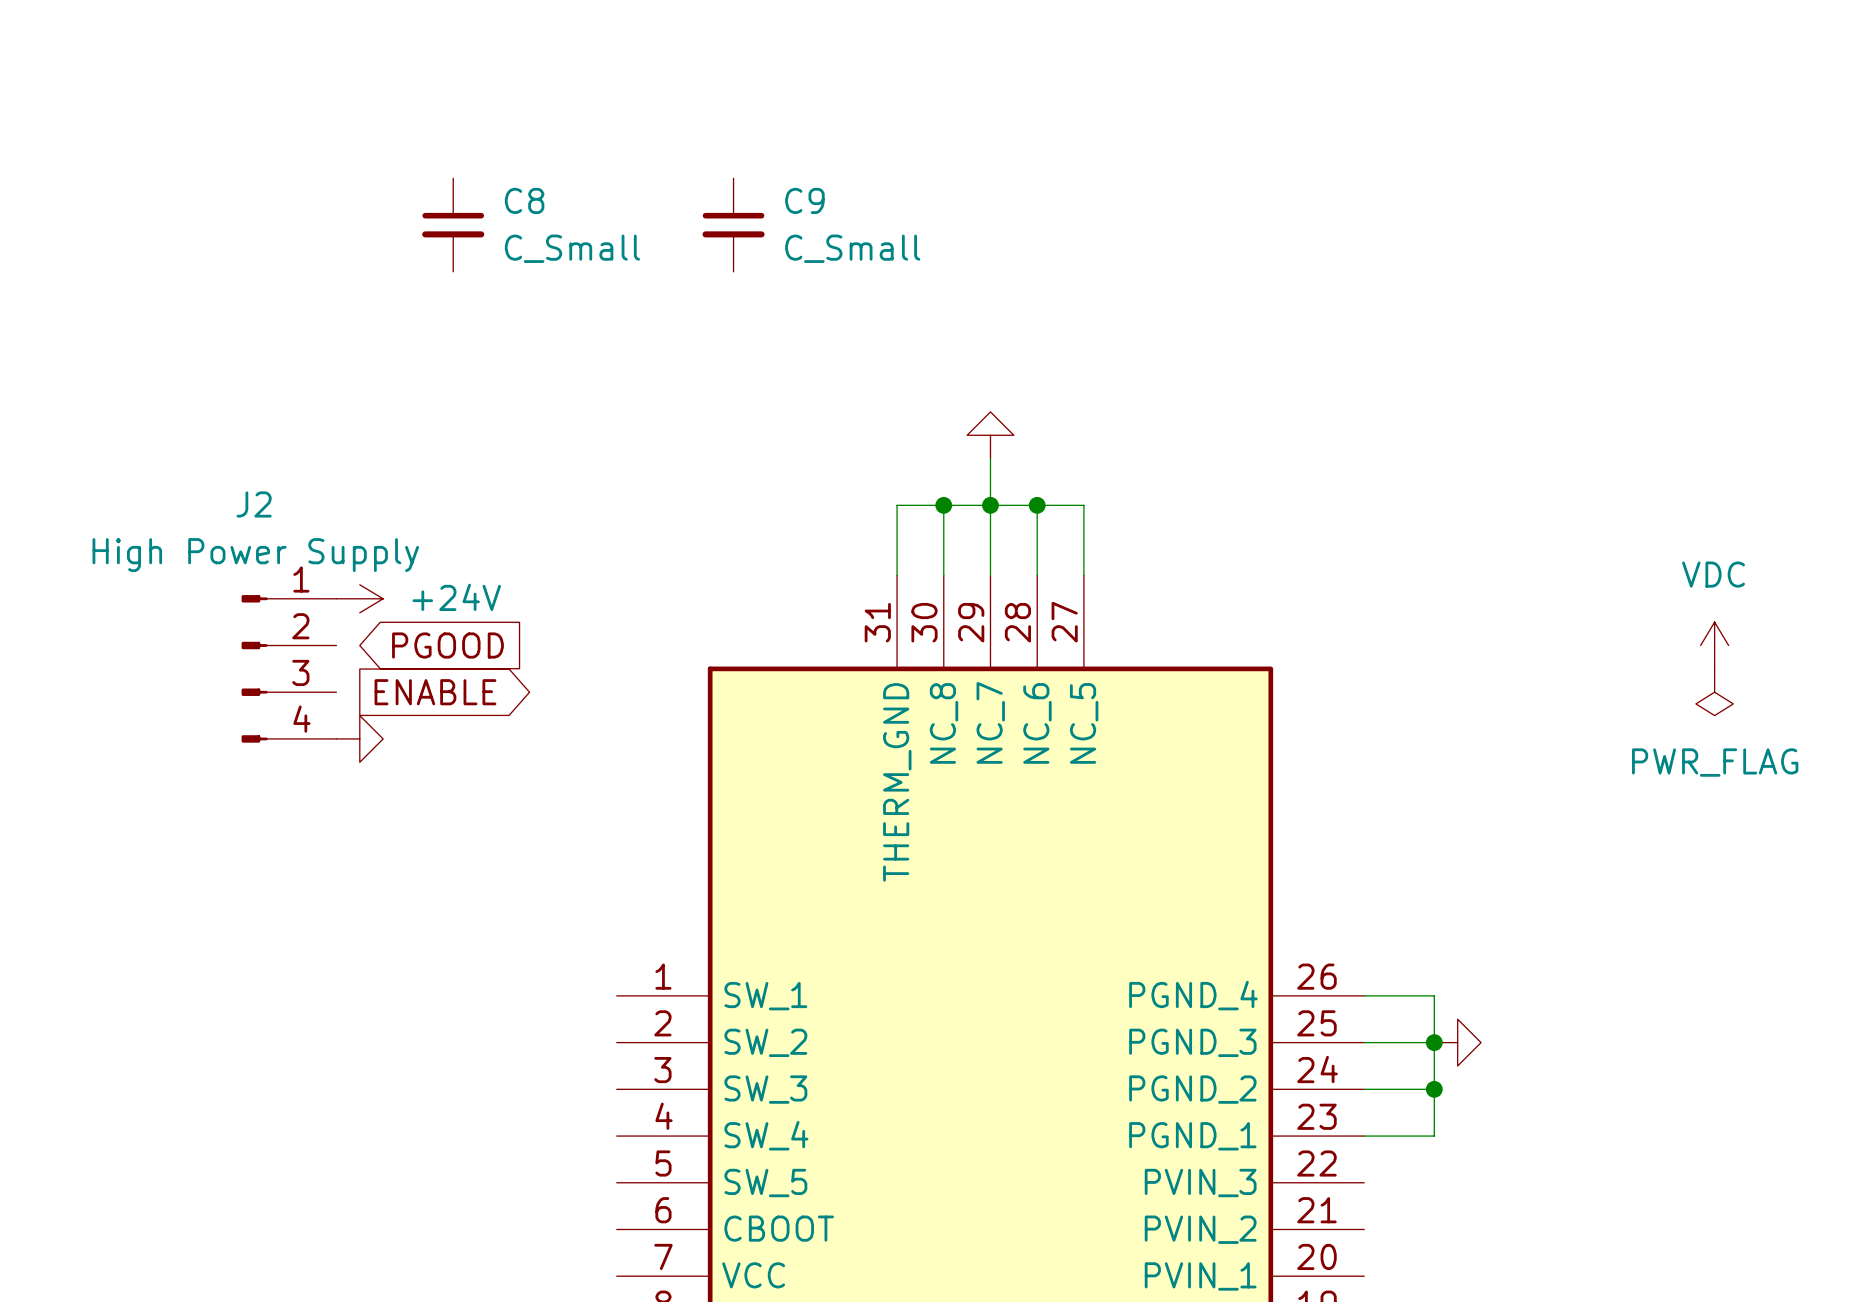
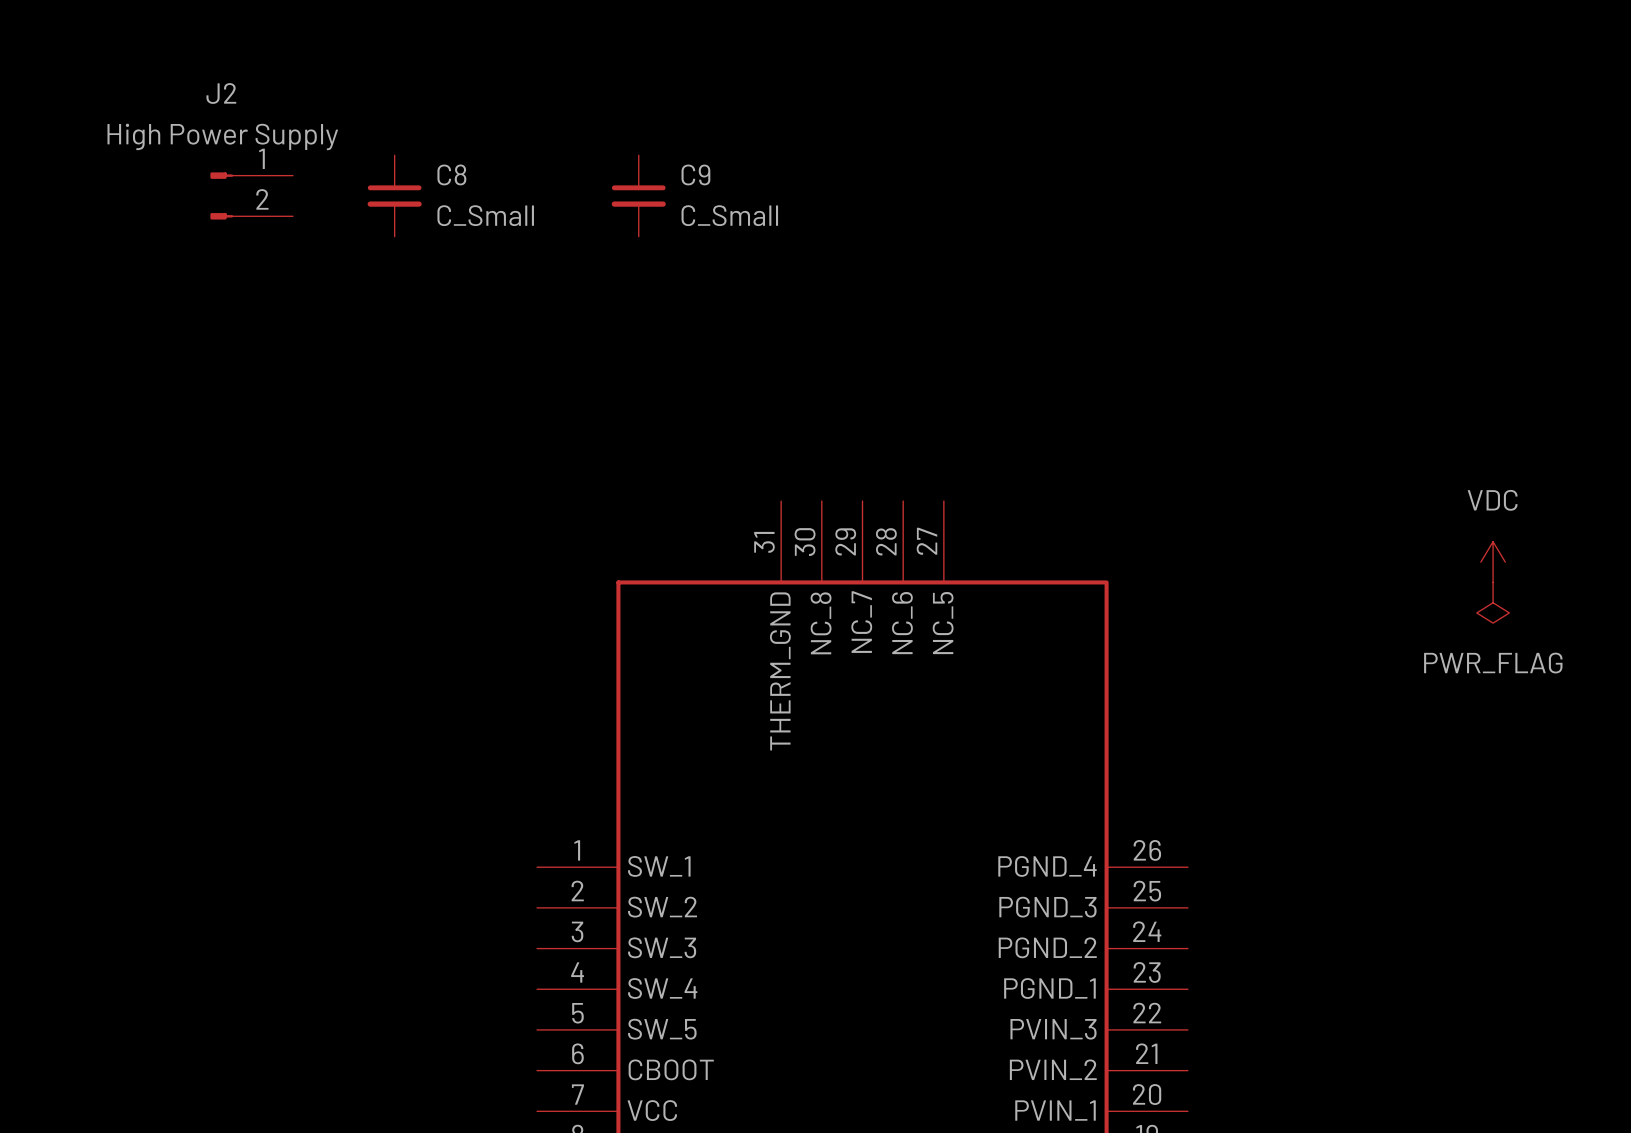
power symbol: (990, 435) -> none
wire: (990, 458) (990, 575) -> none
J2 name position: J2 (254, 504) -> J2 (221, 93)
wire: (943, 505) (943, 575) -> none
junction: (943, 505) -> none
junction: (990, 505) -> none
wire: (1037, 505) (1037, 575) -> none
junction: (1037, 505) -> none
J2 value position: High Power Supply (255, 555) -> High Power Supply (222, 136)
wire: (897, 575) (897, 505) (1083, 505) (1083, 575) -> none
J2 symbol: [241, 595, 337, 743] -> [210, 172, 293, 220]
power symbol: +24V (359, 598) -> none
global label: PGOOD (447, 645) -> none
global label: ENABLE (435, 692) -> none
power symbol: (359, 738) -> none
wire: (1364, 995) (1434, 995) (1434, 1136) (1364, 1136) -> none
wire: (1364, 1042) (1434, 1042) -> none
junction: (1434, 1042) -> none
power symbol: (1457, 1042) -> none
wire: (1364, 1089) (1434, 1089) -> none
junction: (1434, 1089) -> none

